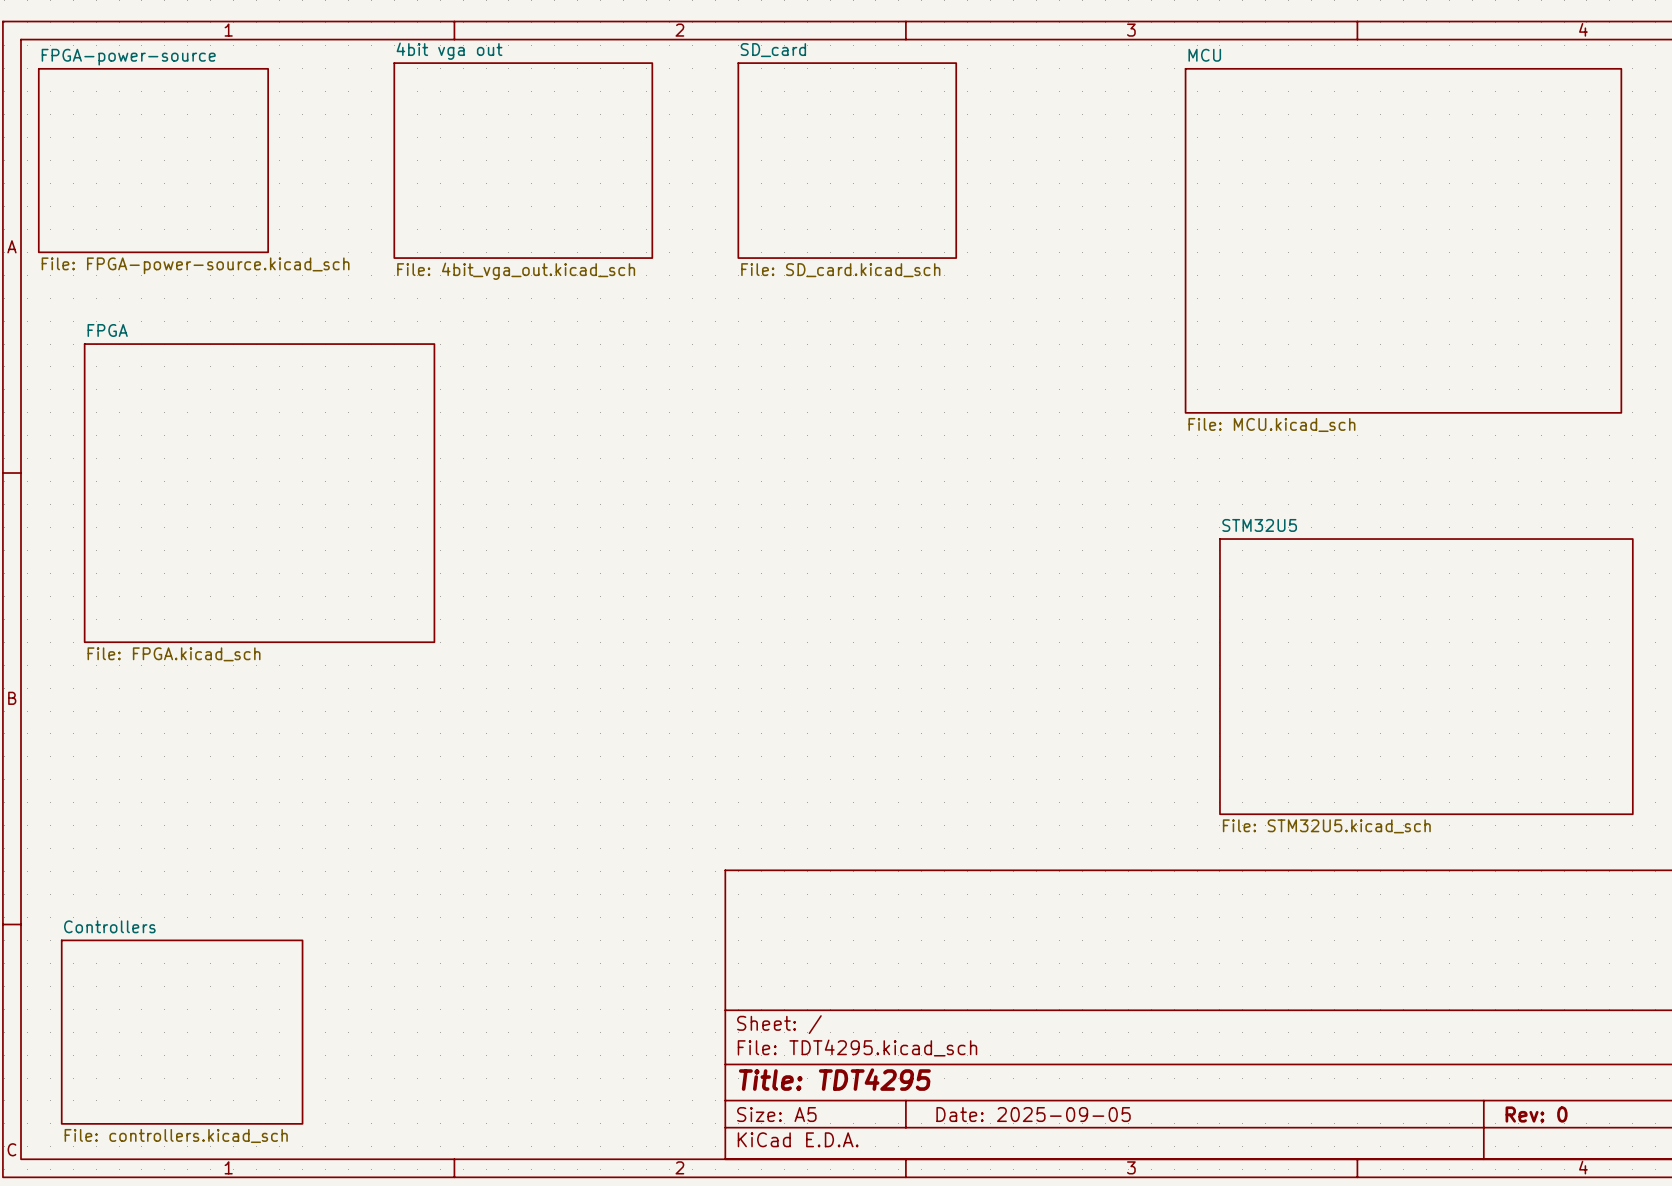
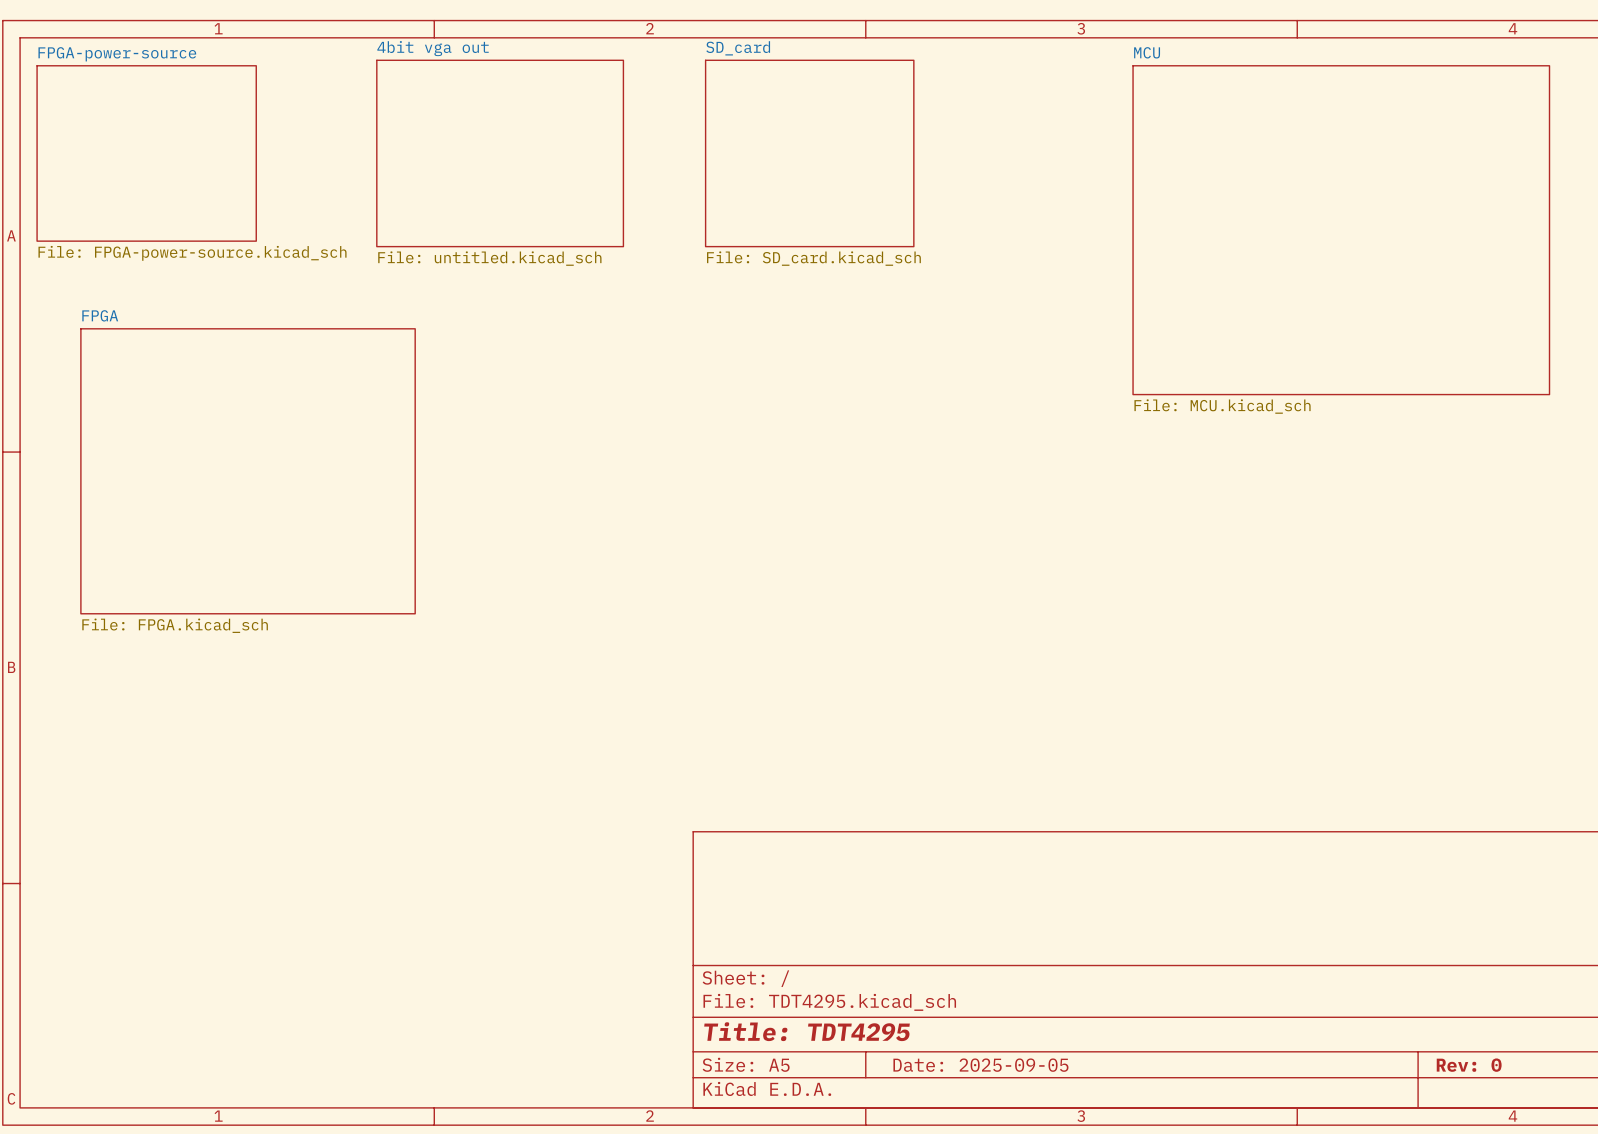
sheet 4bit vga out value: File: 4bit_vga_out.kicad_sch (516, 271) -> File: untitled.kicad_sch (489, 258)
sheet STM32U5: File: STM32U5.kicad_sch (1426, 676) -> none
sheet Controllers: File: controllers.kicad_sch (182, 1032) -> none

